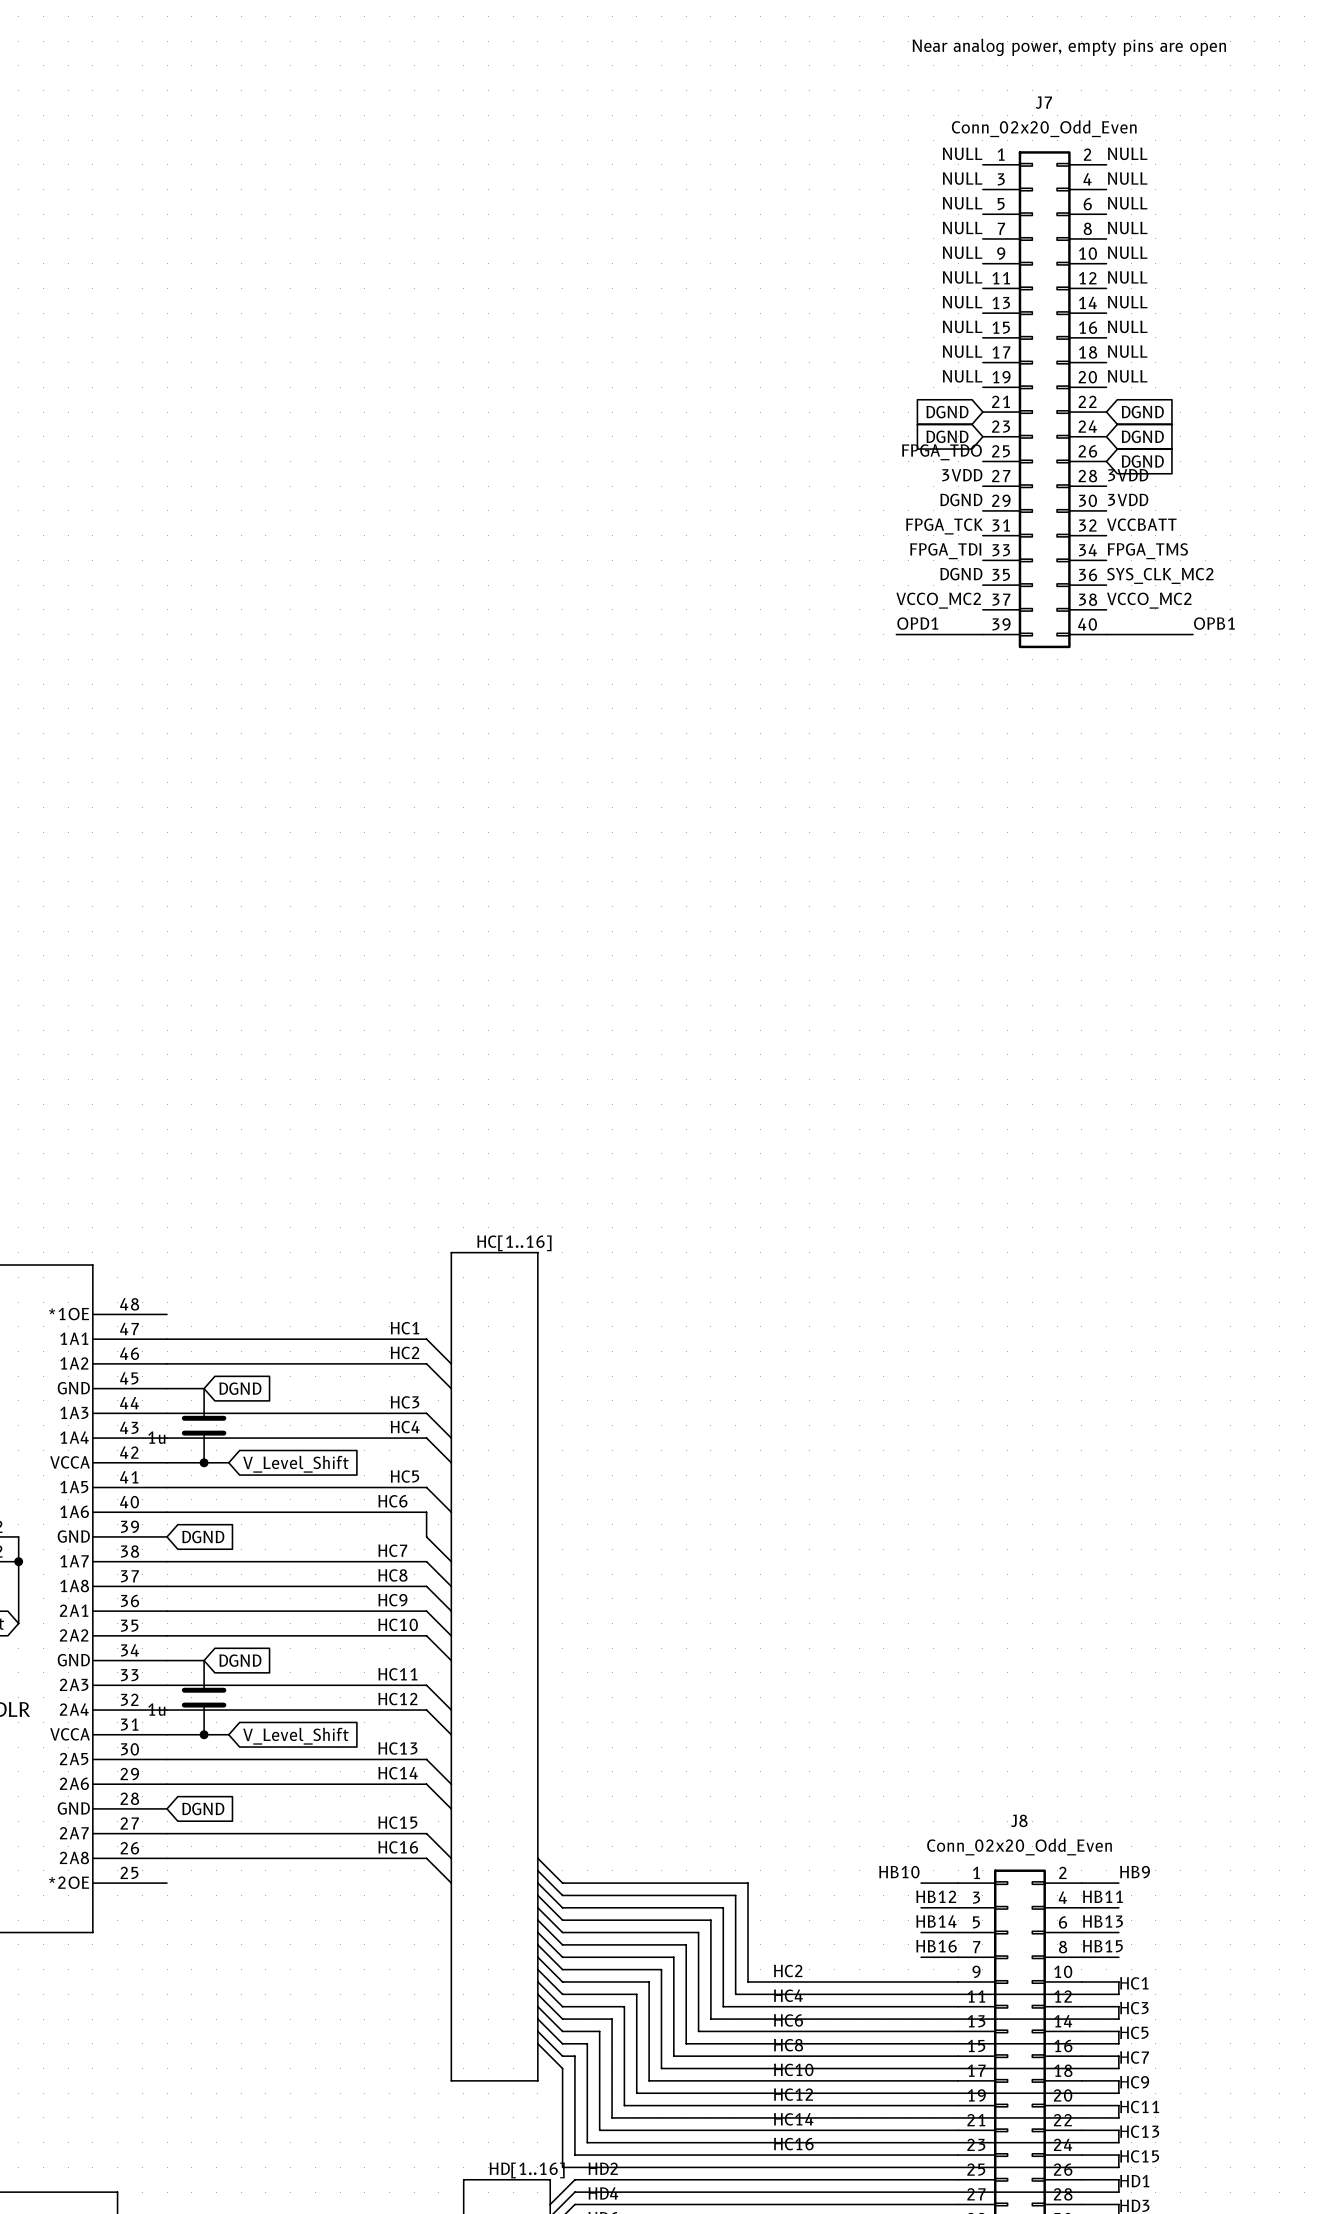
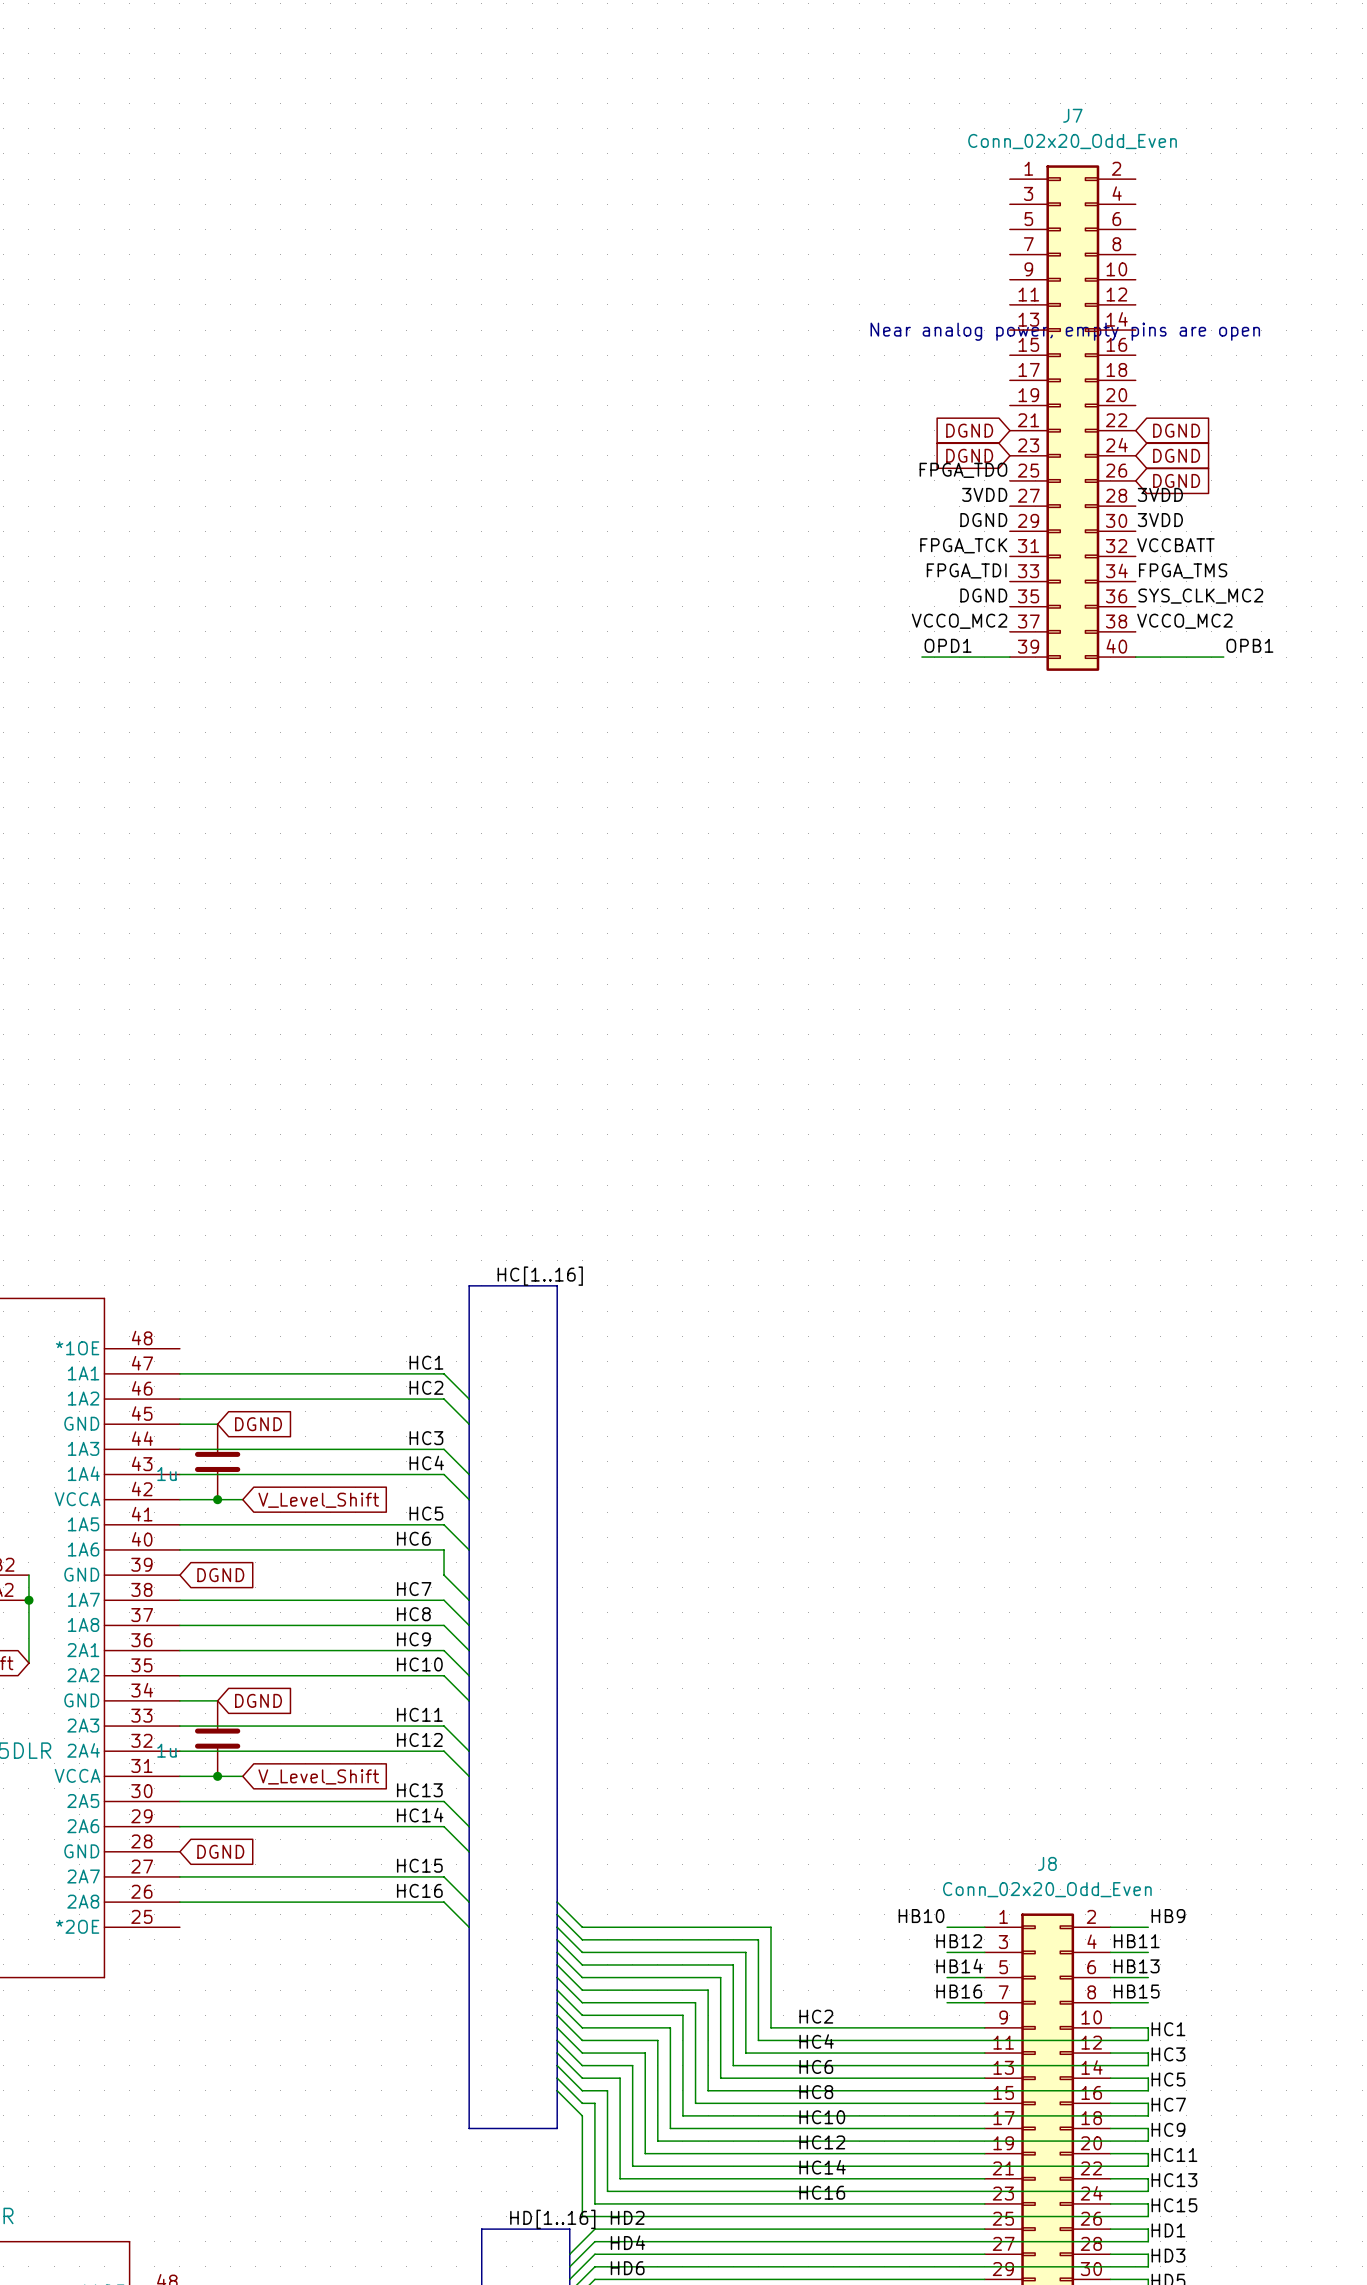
text: Near analog power, empty pins are open (1069, 47) -> none
label: NULL (962, 153) -> none
label: NULL (1127, 153) -> none
label: NULL (962, 178) -> none
label: NULL (1127, 178) -> none
label: NULL (962, 203) -> none
label: NULL (1127, 203) -> none
label: NULL (962, 228) -> none
label: NULL (1127, 228) -> none
label: NULL (962, 252) -> none
label: NULL (1127, 252) -> none
label: NULL (962, 277) -> none
label: NULL (1127, 277) -> none
label: NULL (962, 302) -> none
label: NULL (1127, 302) -> none
text: none -> Near analog power, empty pins are open (1065, 331)
label: NULL (962, 326) -> none
label: NULL (1127, 326) -> none
label: NULL (962, 351) -> none
label: NULL (1127, 351) -> none
label: NULL (962, 376) -> none
label: NULL (1127, 376) -> none

